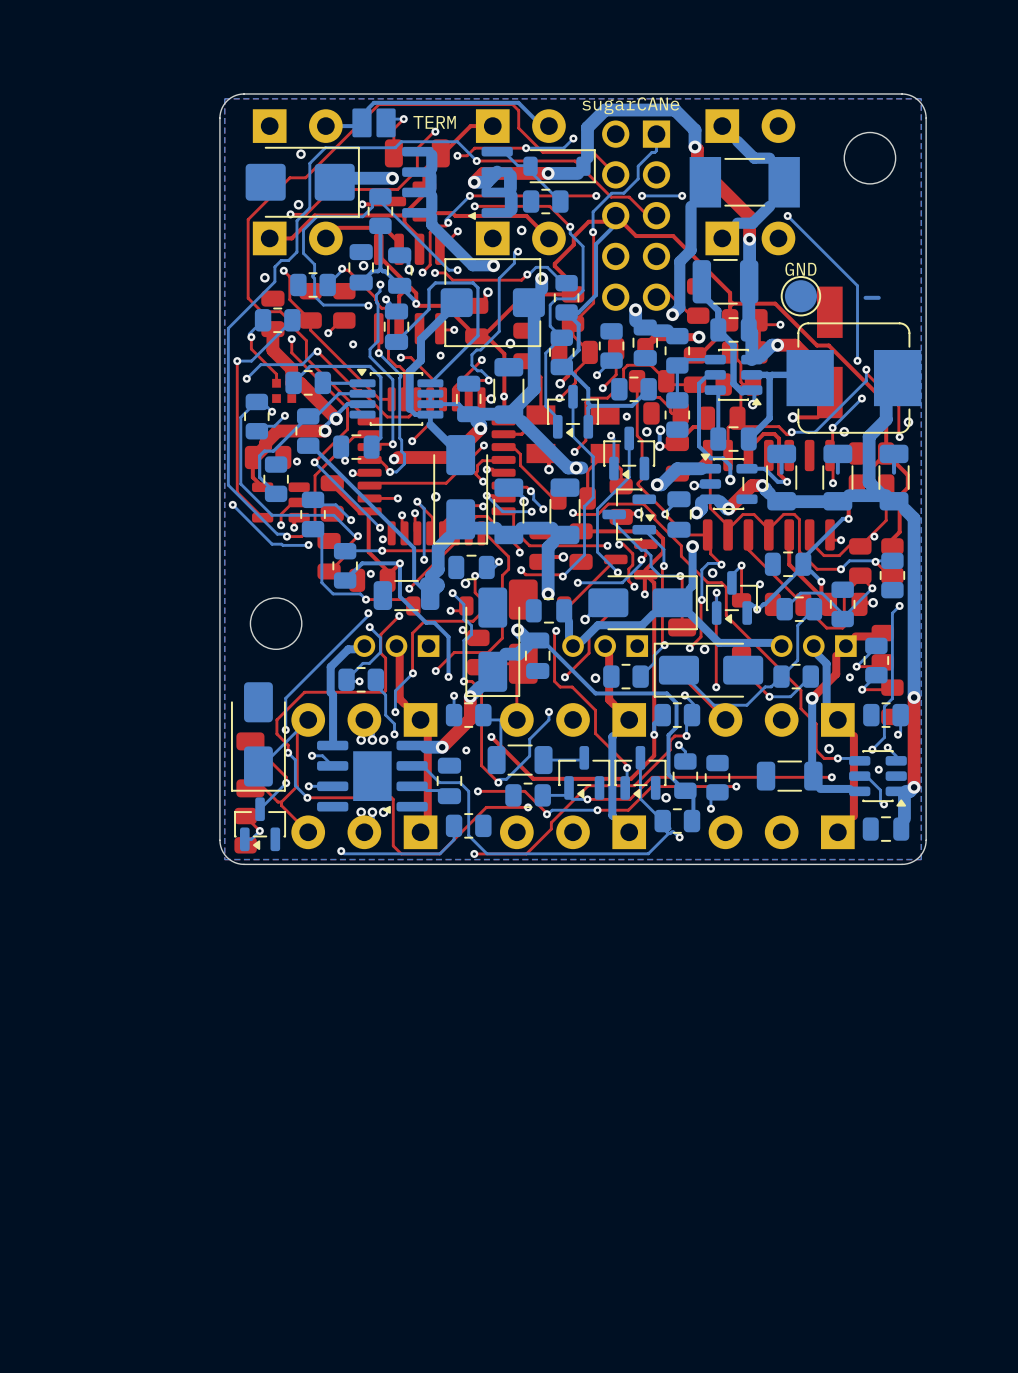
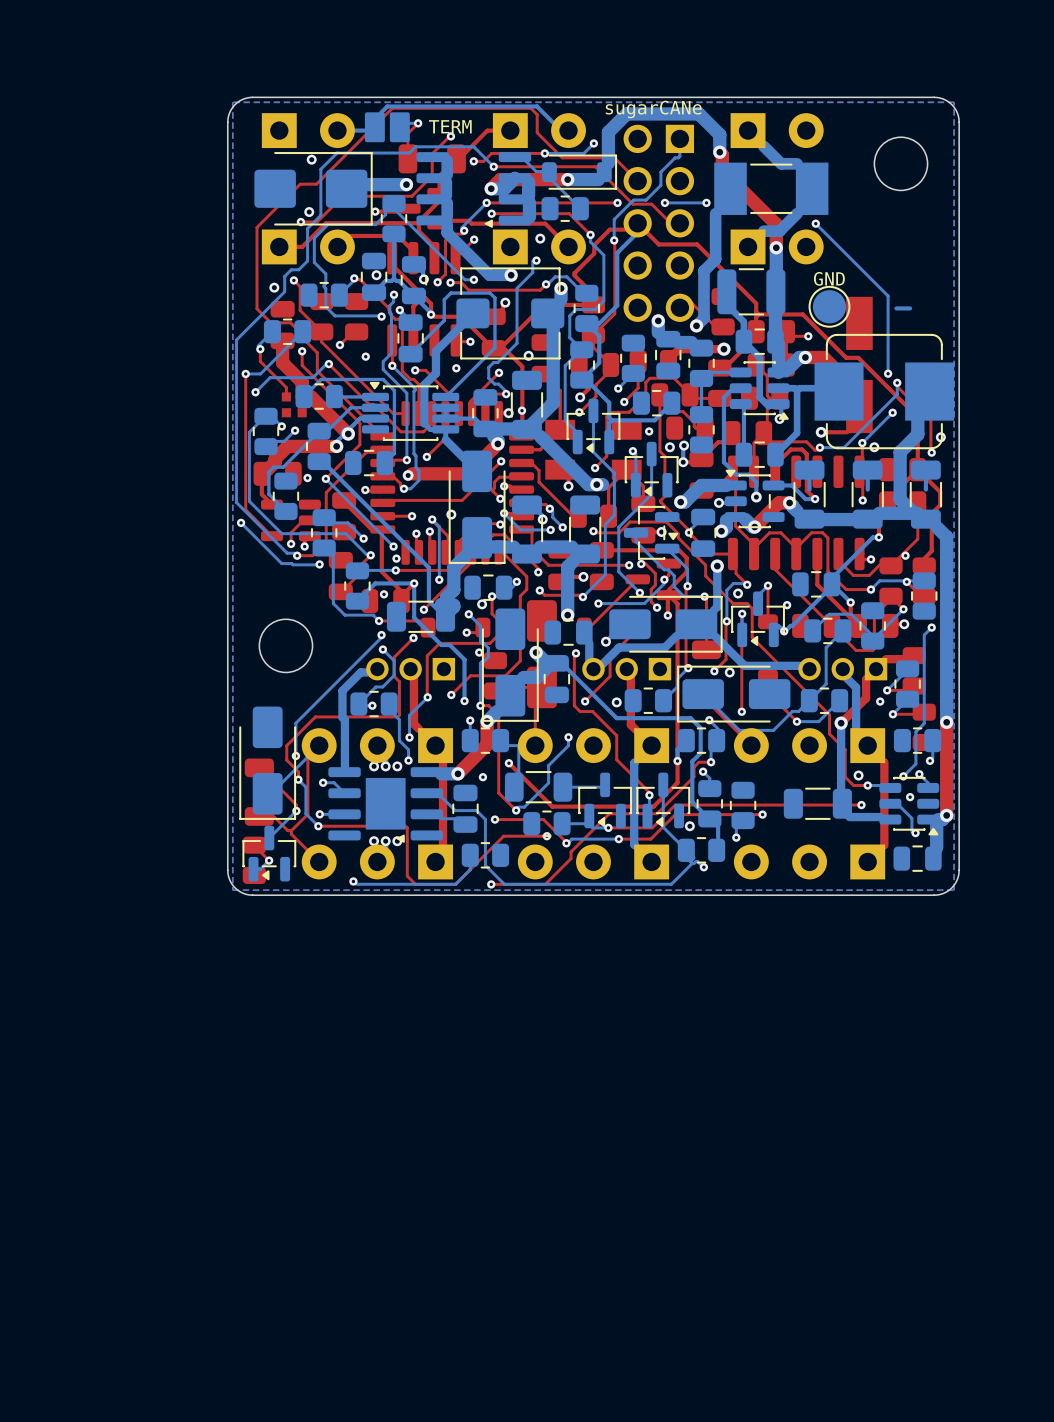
via: (345, 460) -> none

